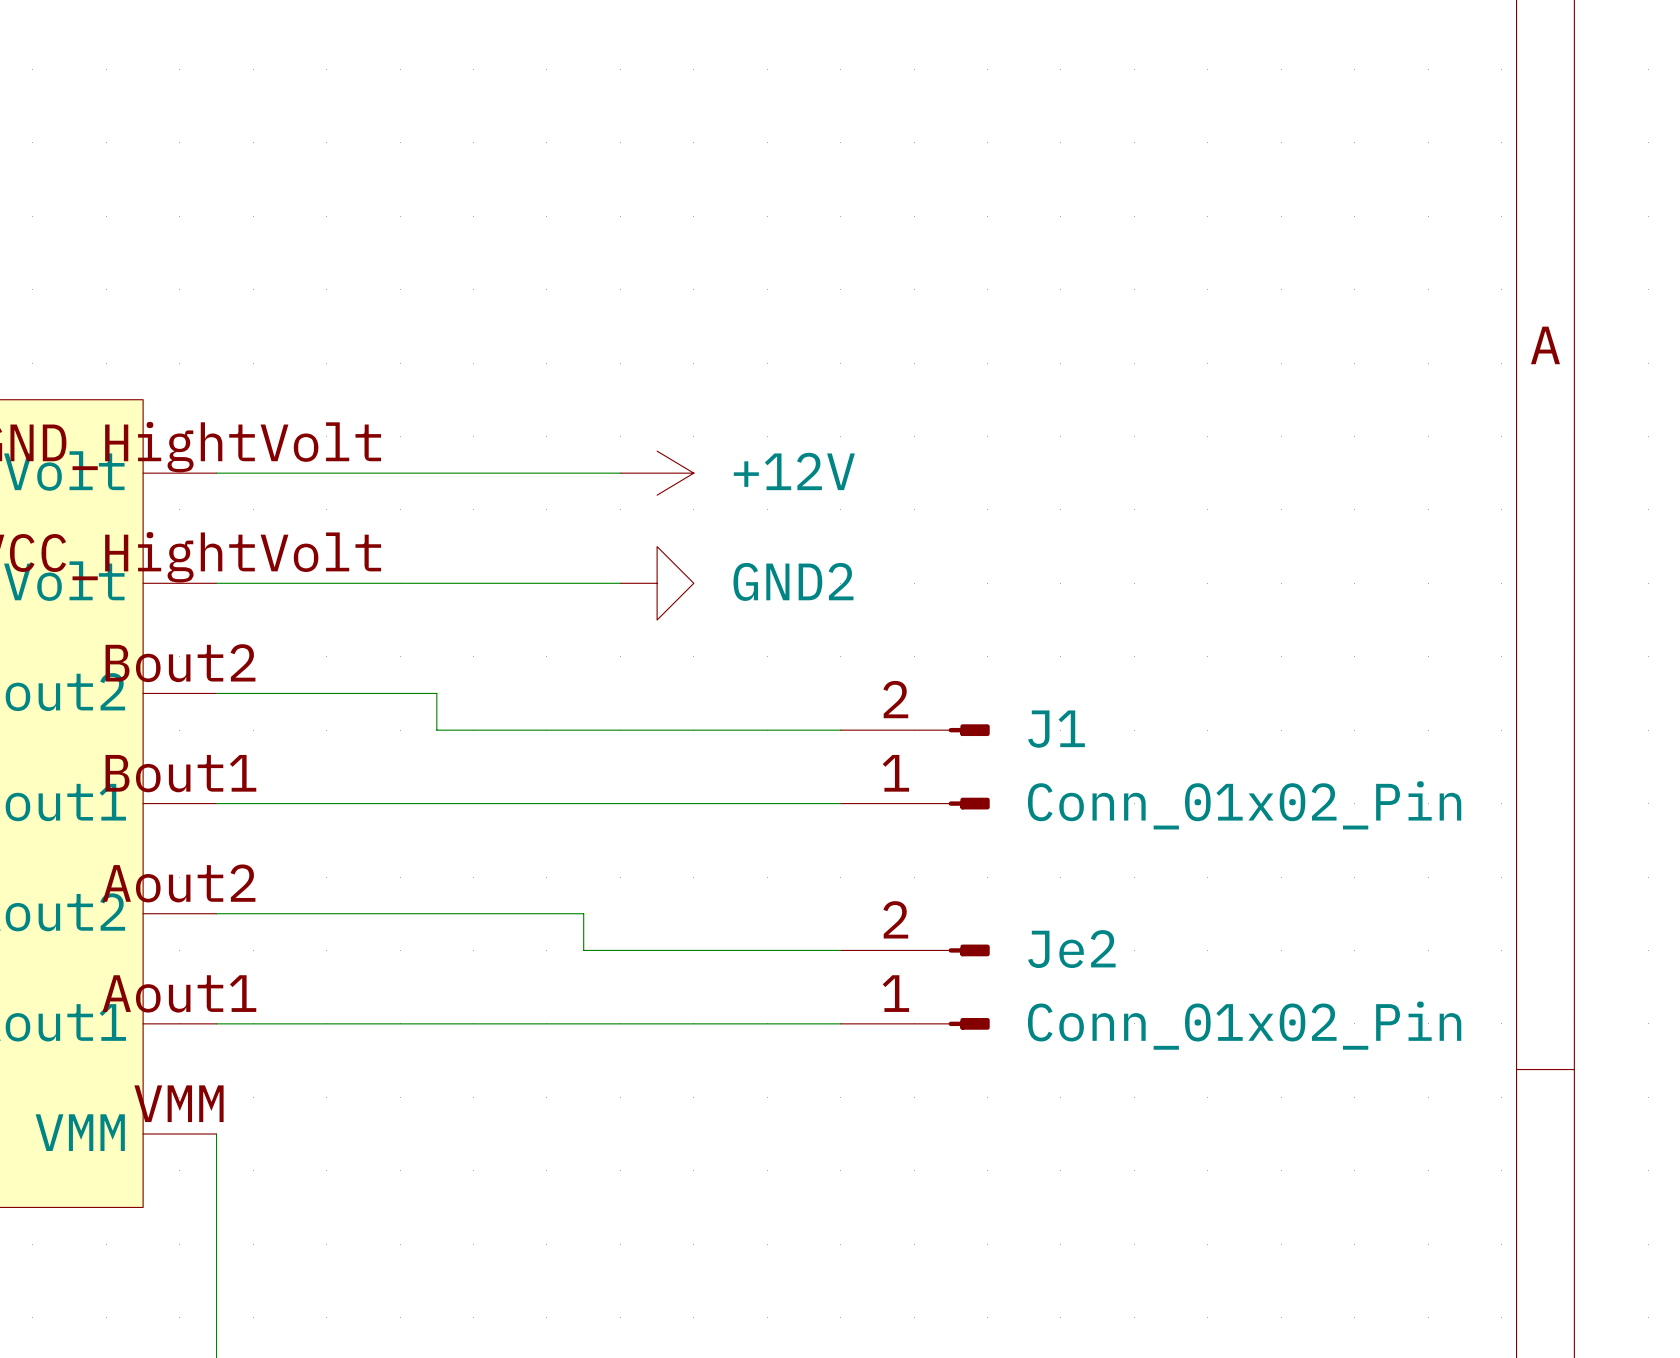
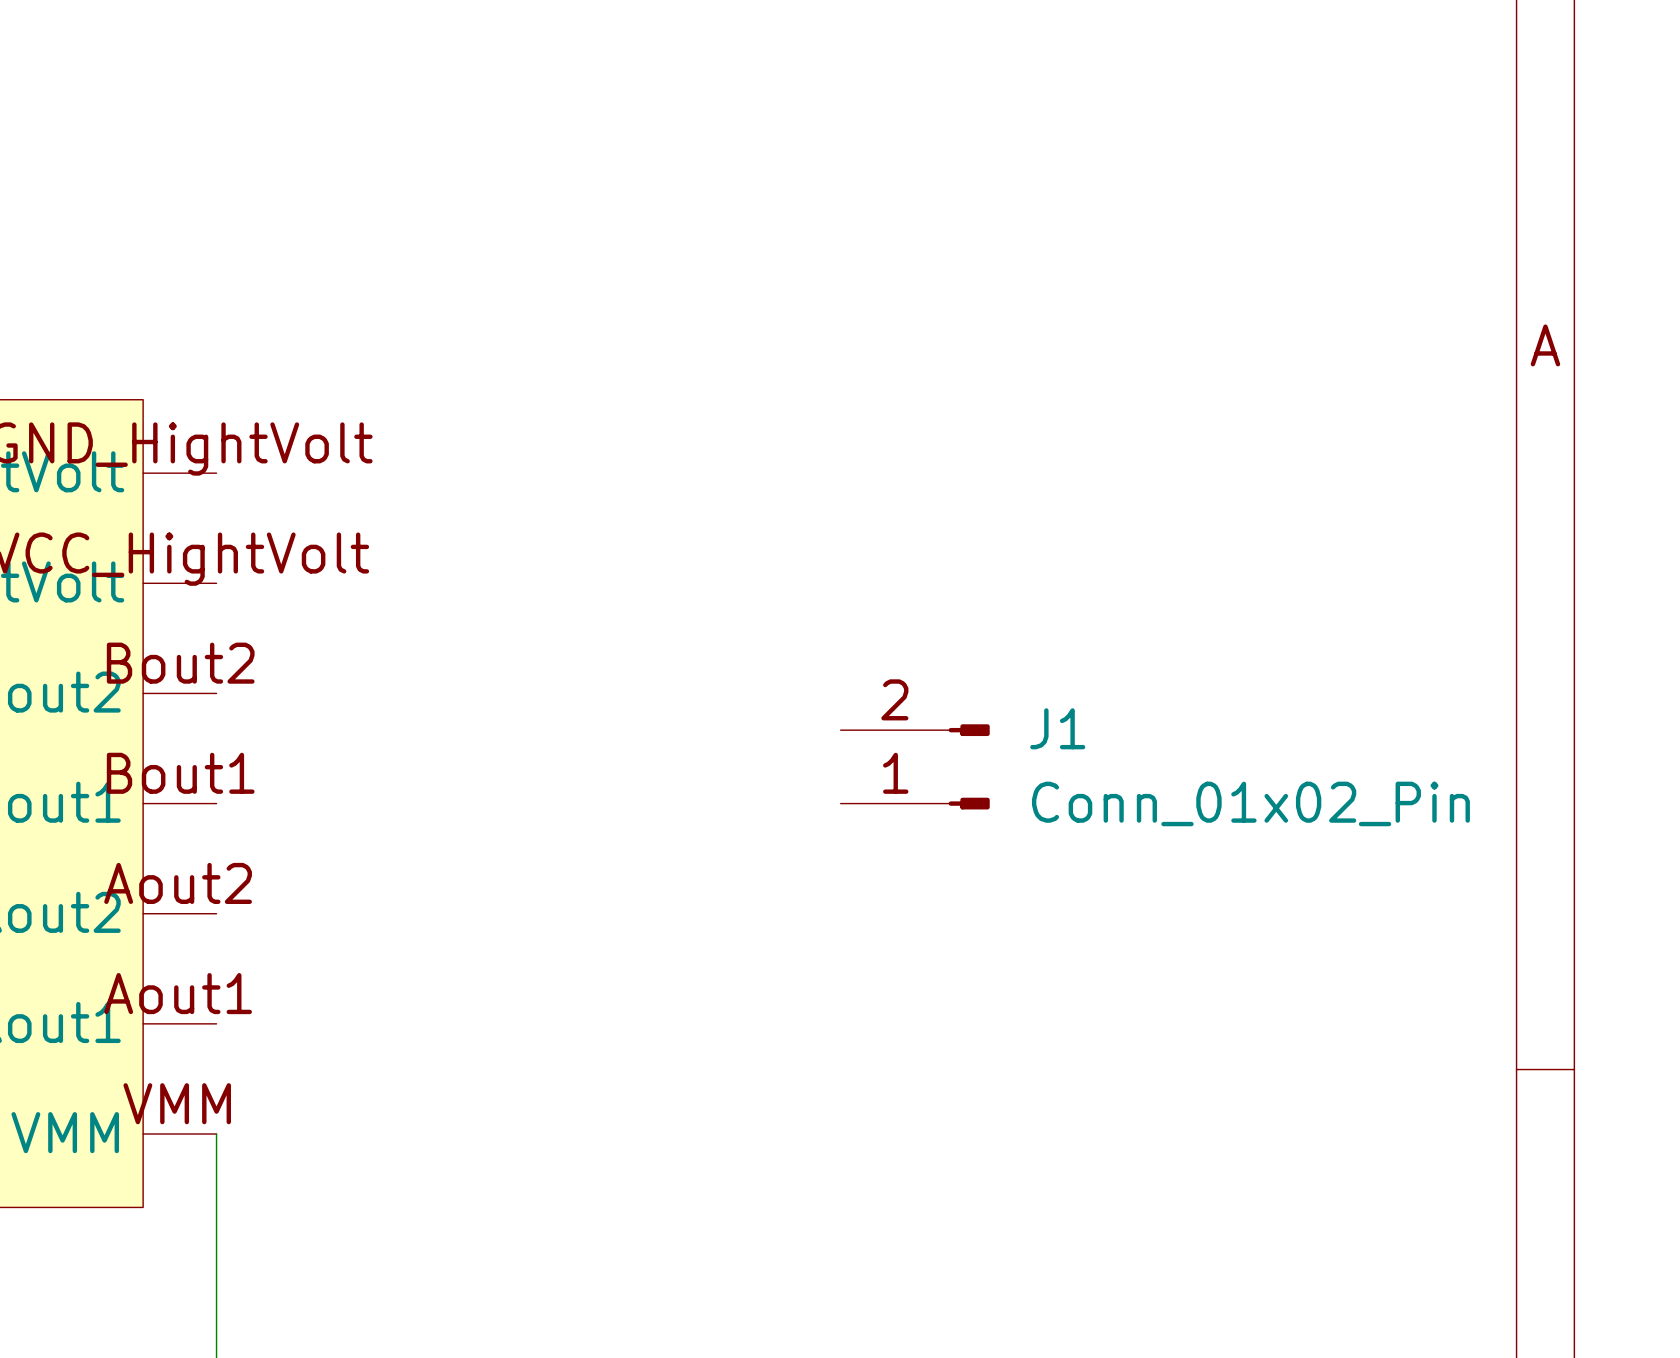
wire: (216, 473) (620, 473) -> none
power symbol: +12V (657, 473) -> none
wire: (216, 583) (620, 583) -> none
power symbol: GND2 (657, 583) -> none
wire: (216, 693) (436, 693) (436, 730) (840, 730) -> none
wire: (216, 803) (840, 803) -> none
wire: (216, 913) (583, 913) (583, 950) (840, 950) -> none
Je2: Conn_01x02_Pin (915, 987) -> none
wire: (216, 1023) (840, 1023) -> none

